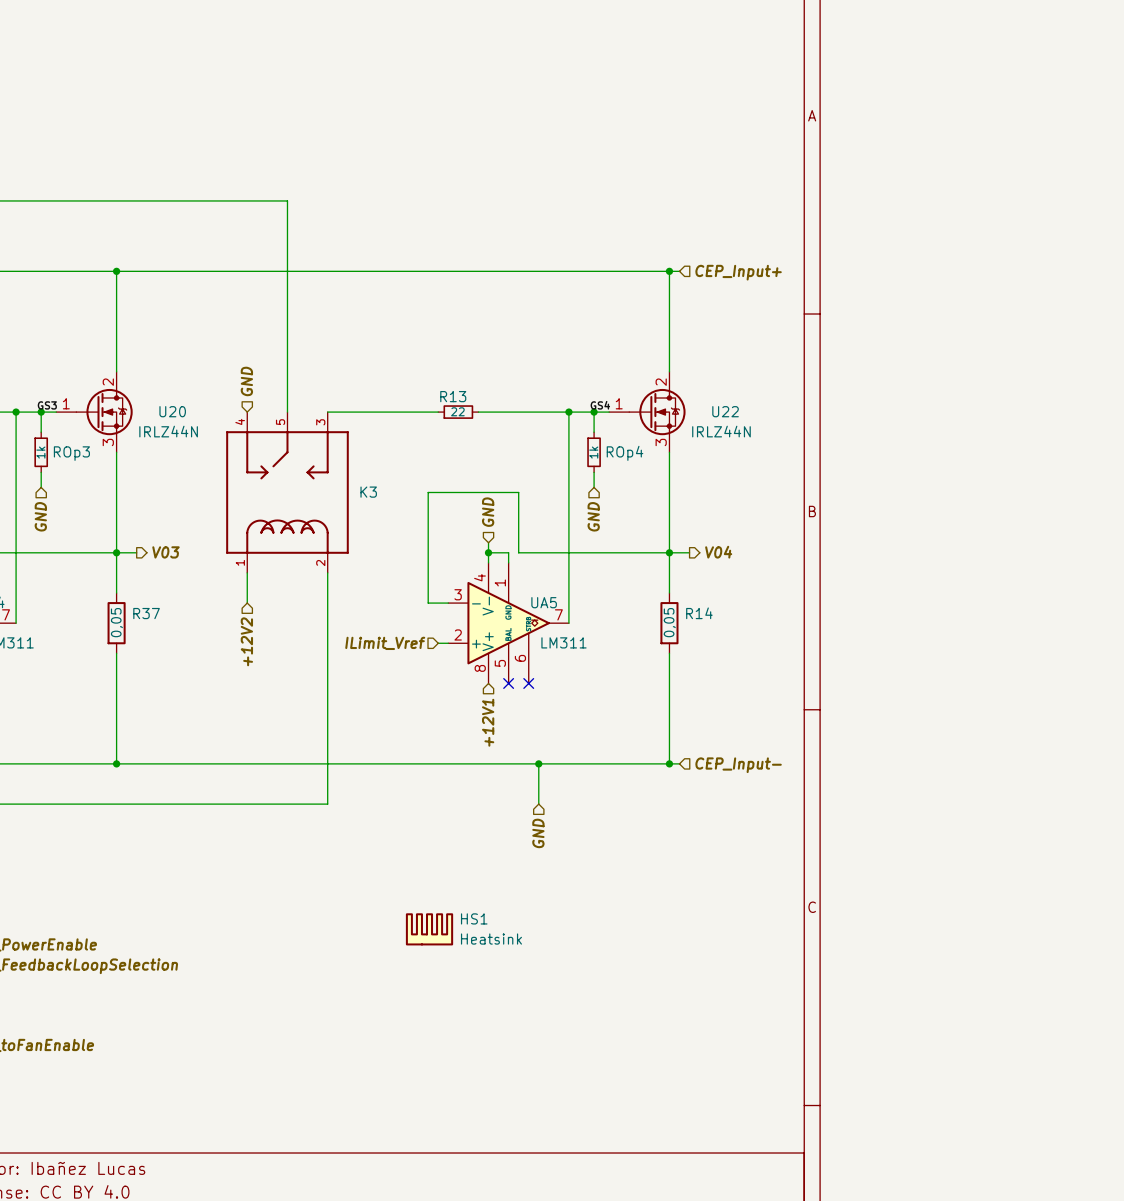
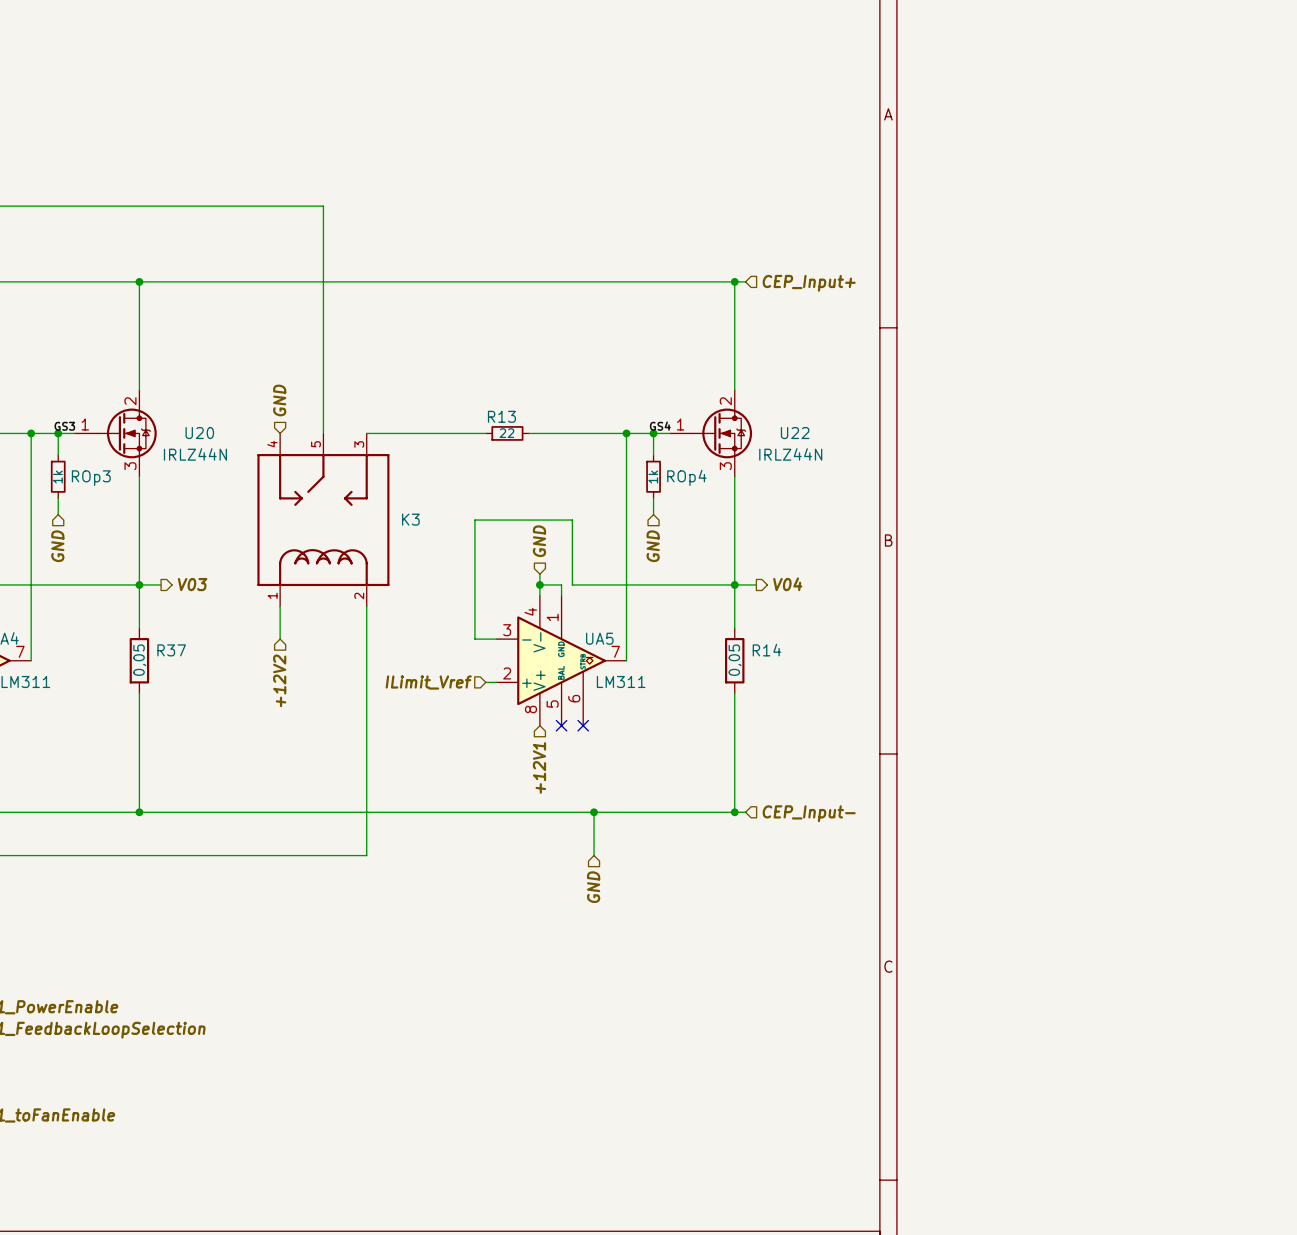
HS1: Heatsink (429, 929) -> none

